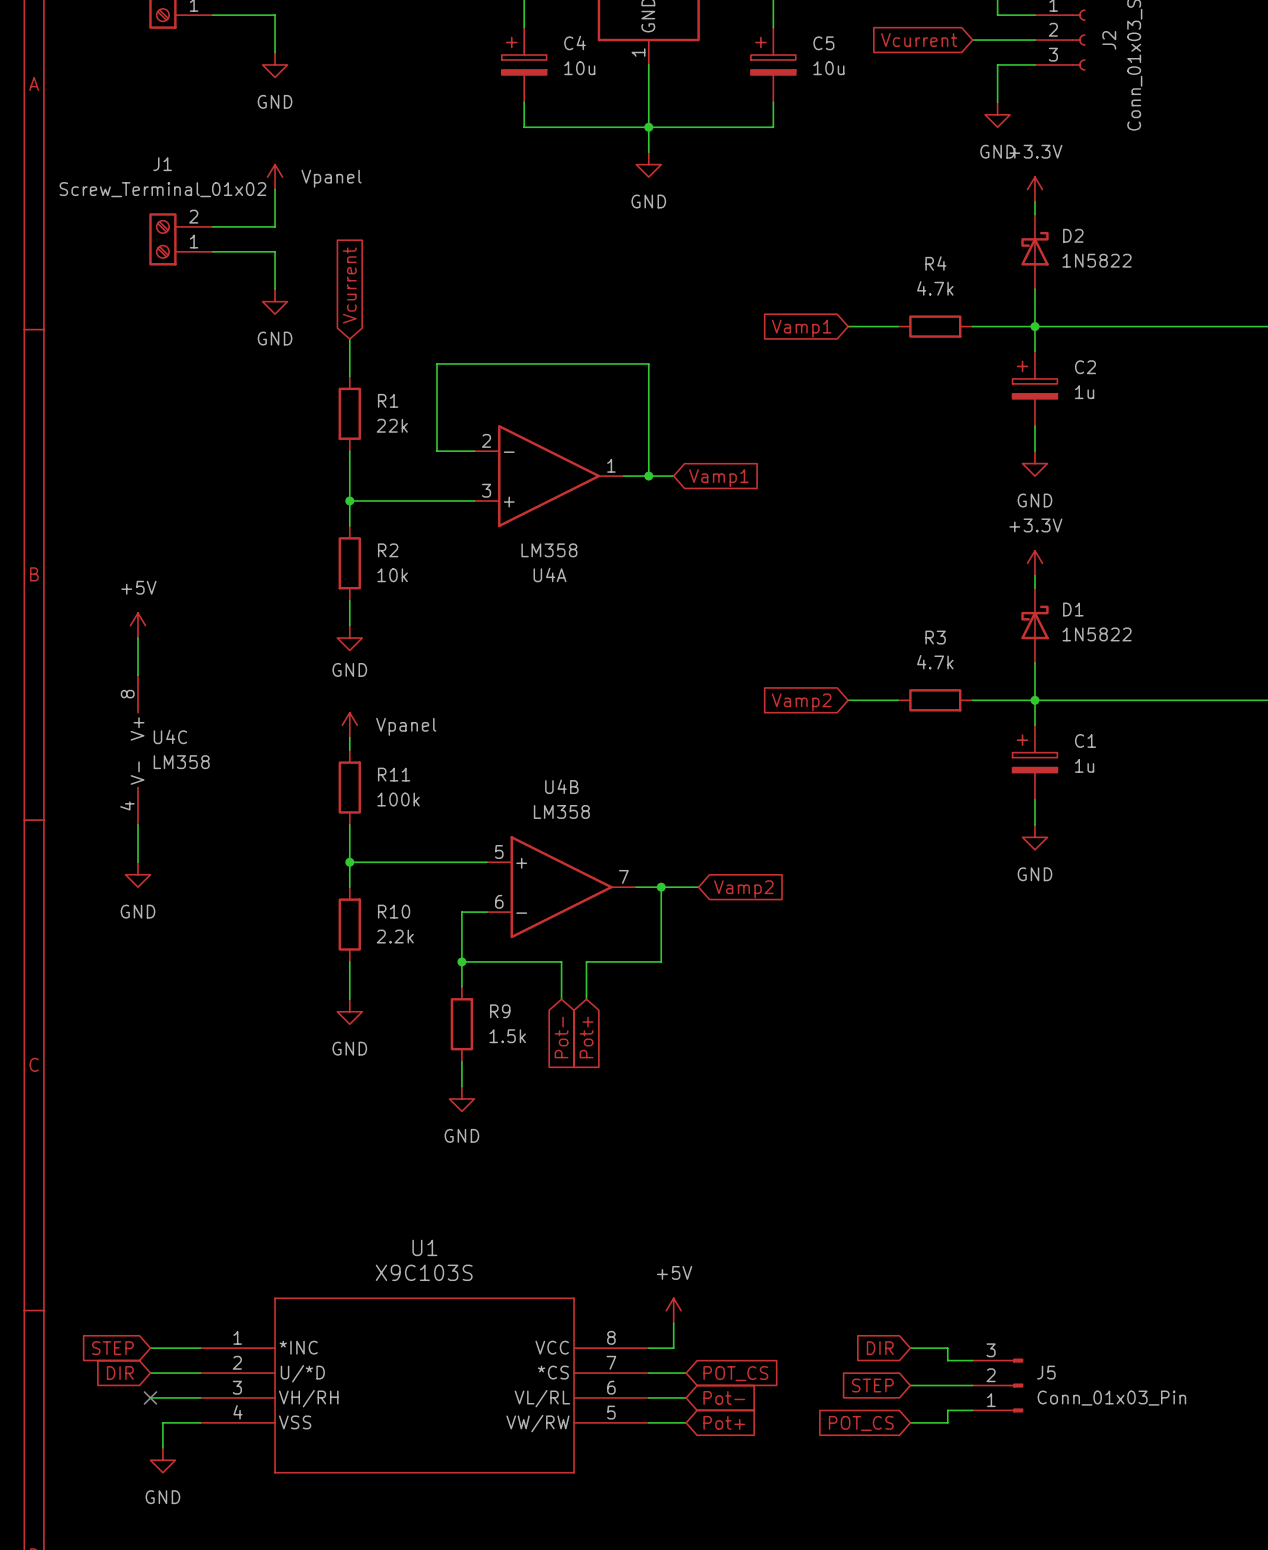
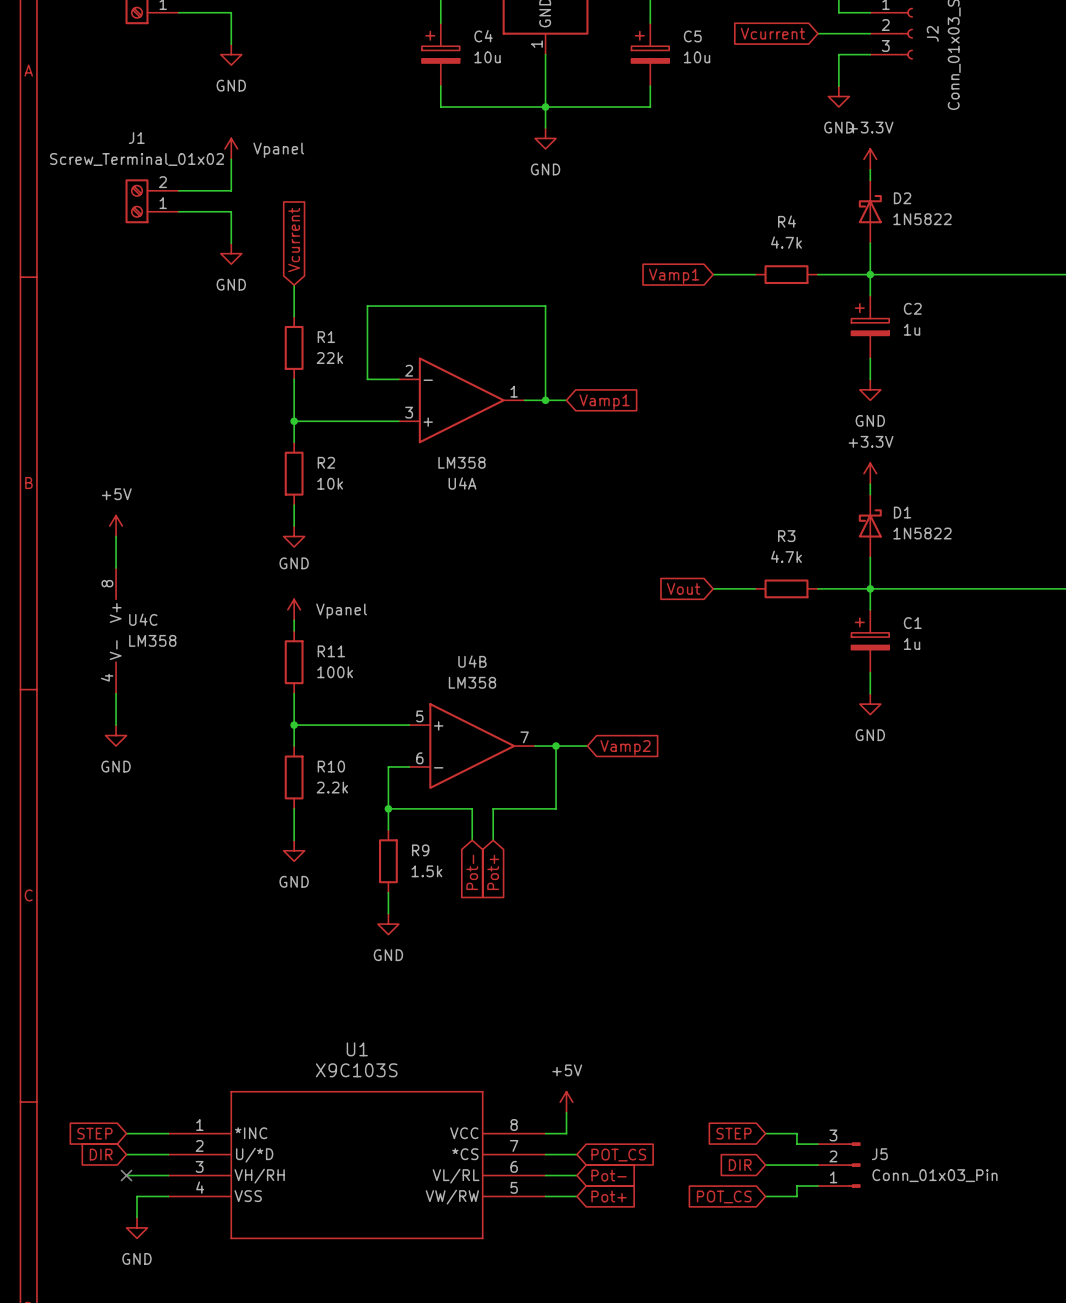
global label: Vamp2 (801, 702) -> Vout (683, 588)
global label: DIR (880, 1348) -> STEP (733, 1133)
global label: STEP (872, 1385) -> DIR (740, 1165)

